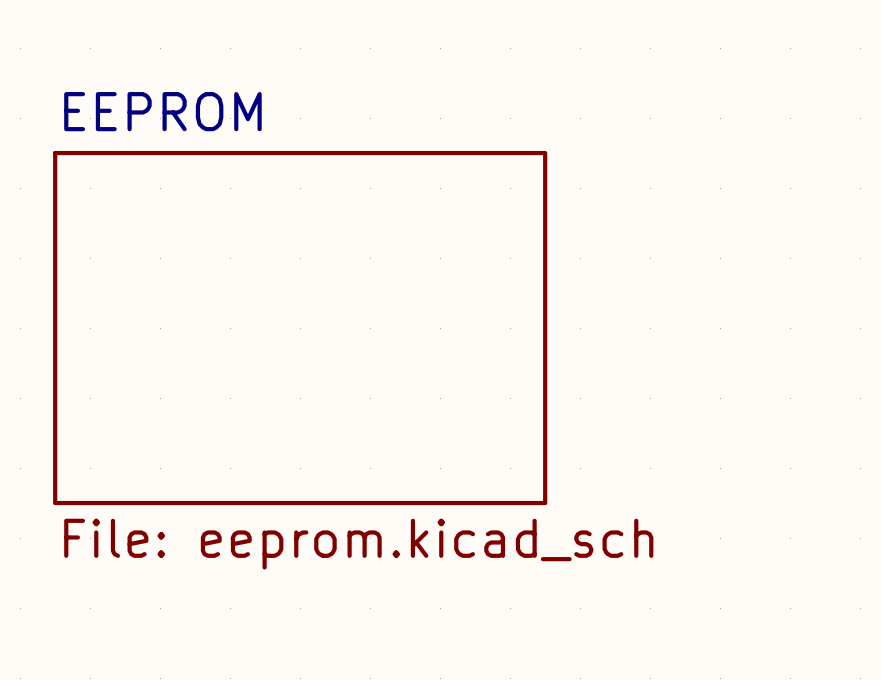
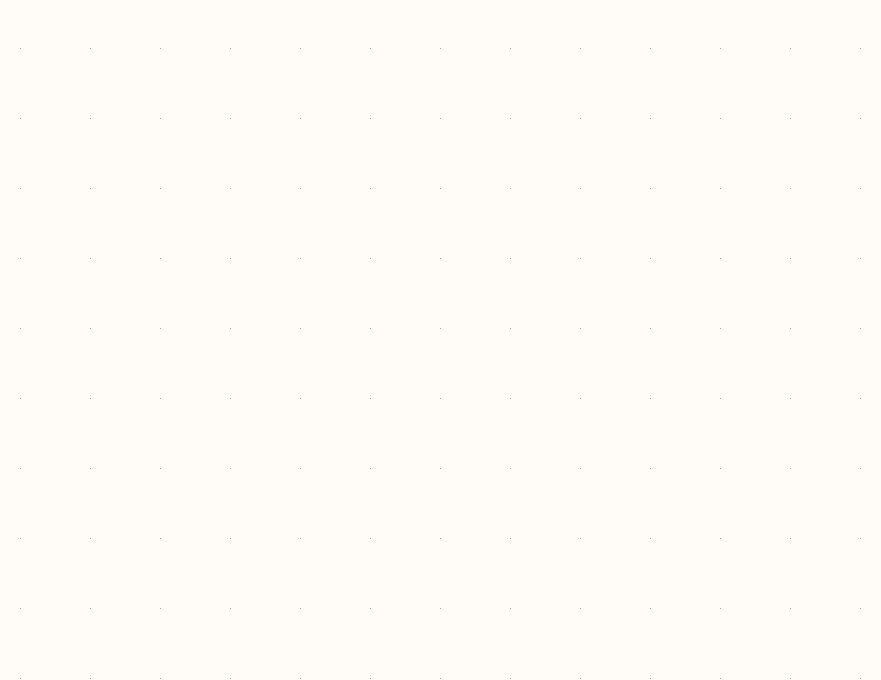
sheet EEPROM: File: eeprom.kicad_sch (300, 328) -> none

